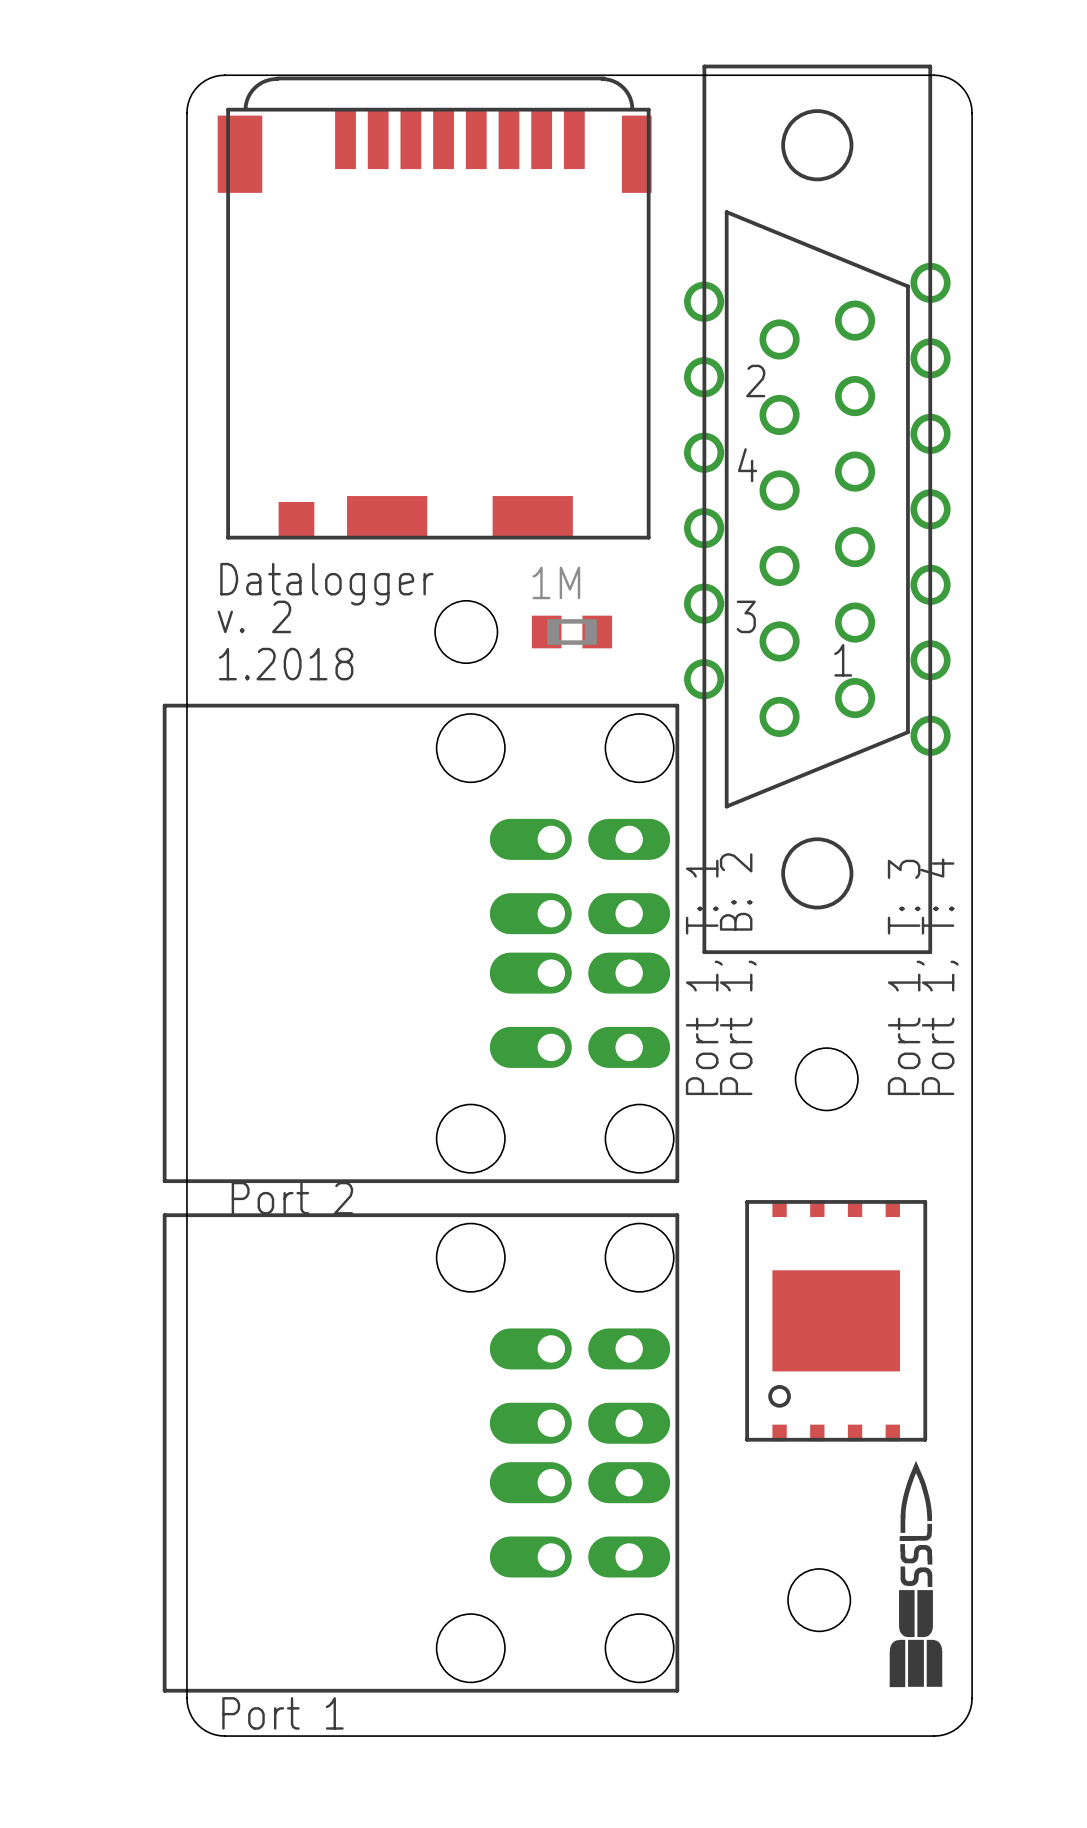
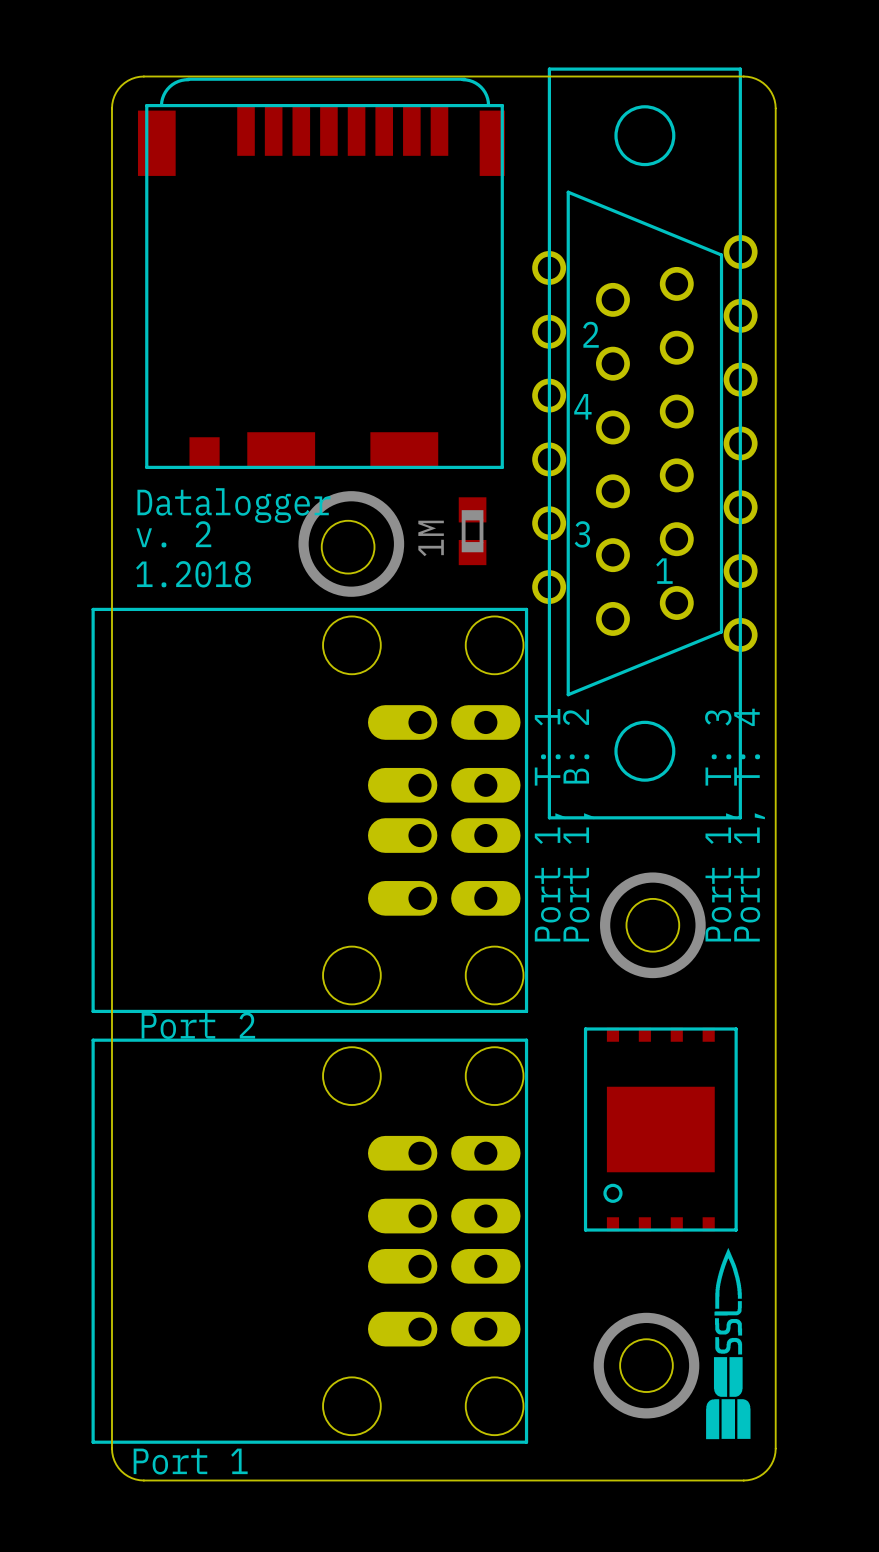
drawing: none -> [298, 491, 405, 597]
part value position: 1M (556, 582) -> 1M (431, 538)
part rotation: 0° (571, 632) -> 90° clockwise (472, 531)
drawing: none -> [600, 872, 706, 979]
drawing: none -> [593, 1312, 700, 1419]

